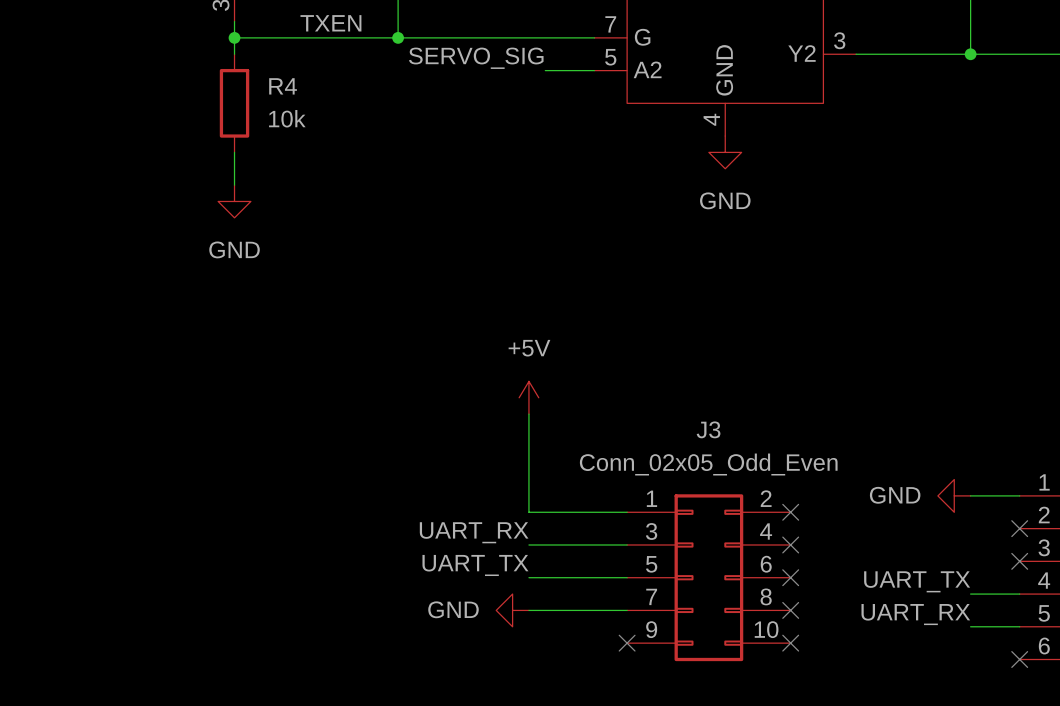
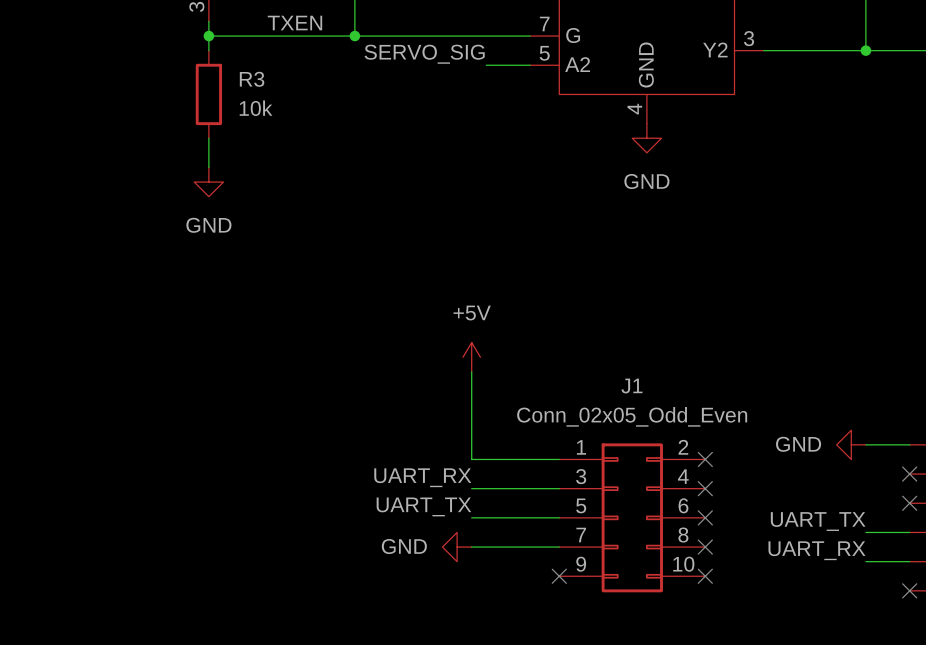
R4 name: R4 (283, 86) -> R3 (252, 79)
J3 name: J3 (708, 429) -> J1 (631, 386)

